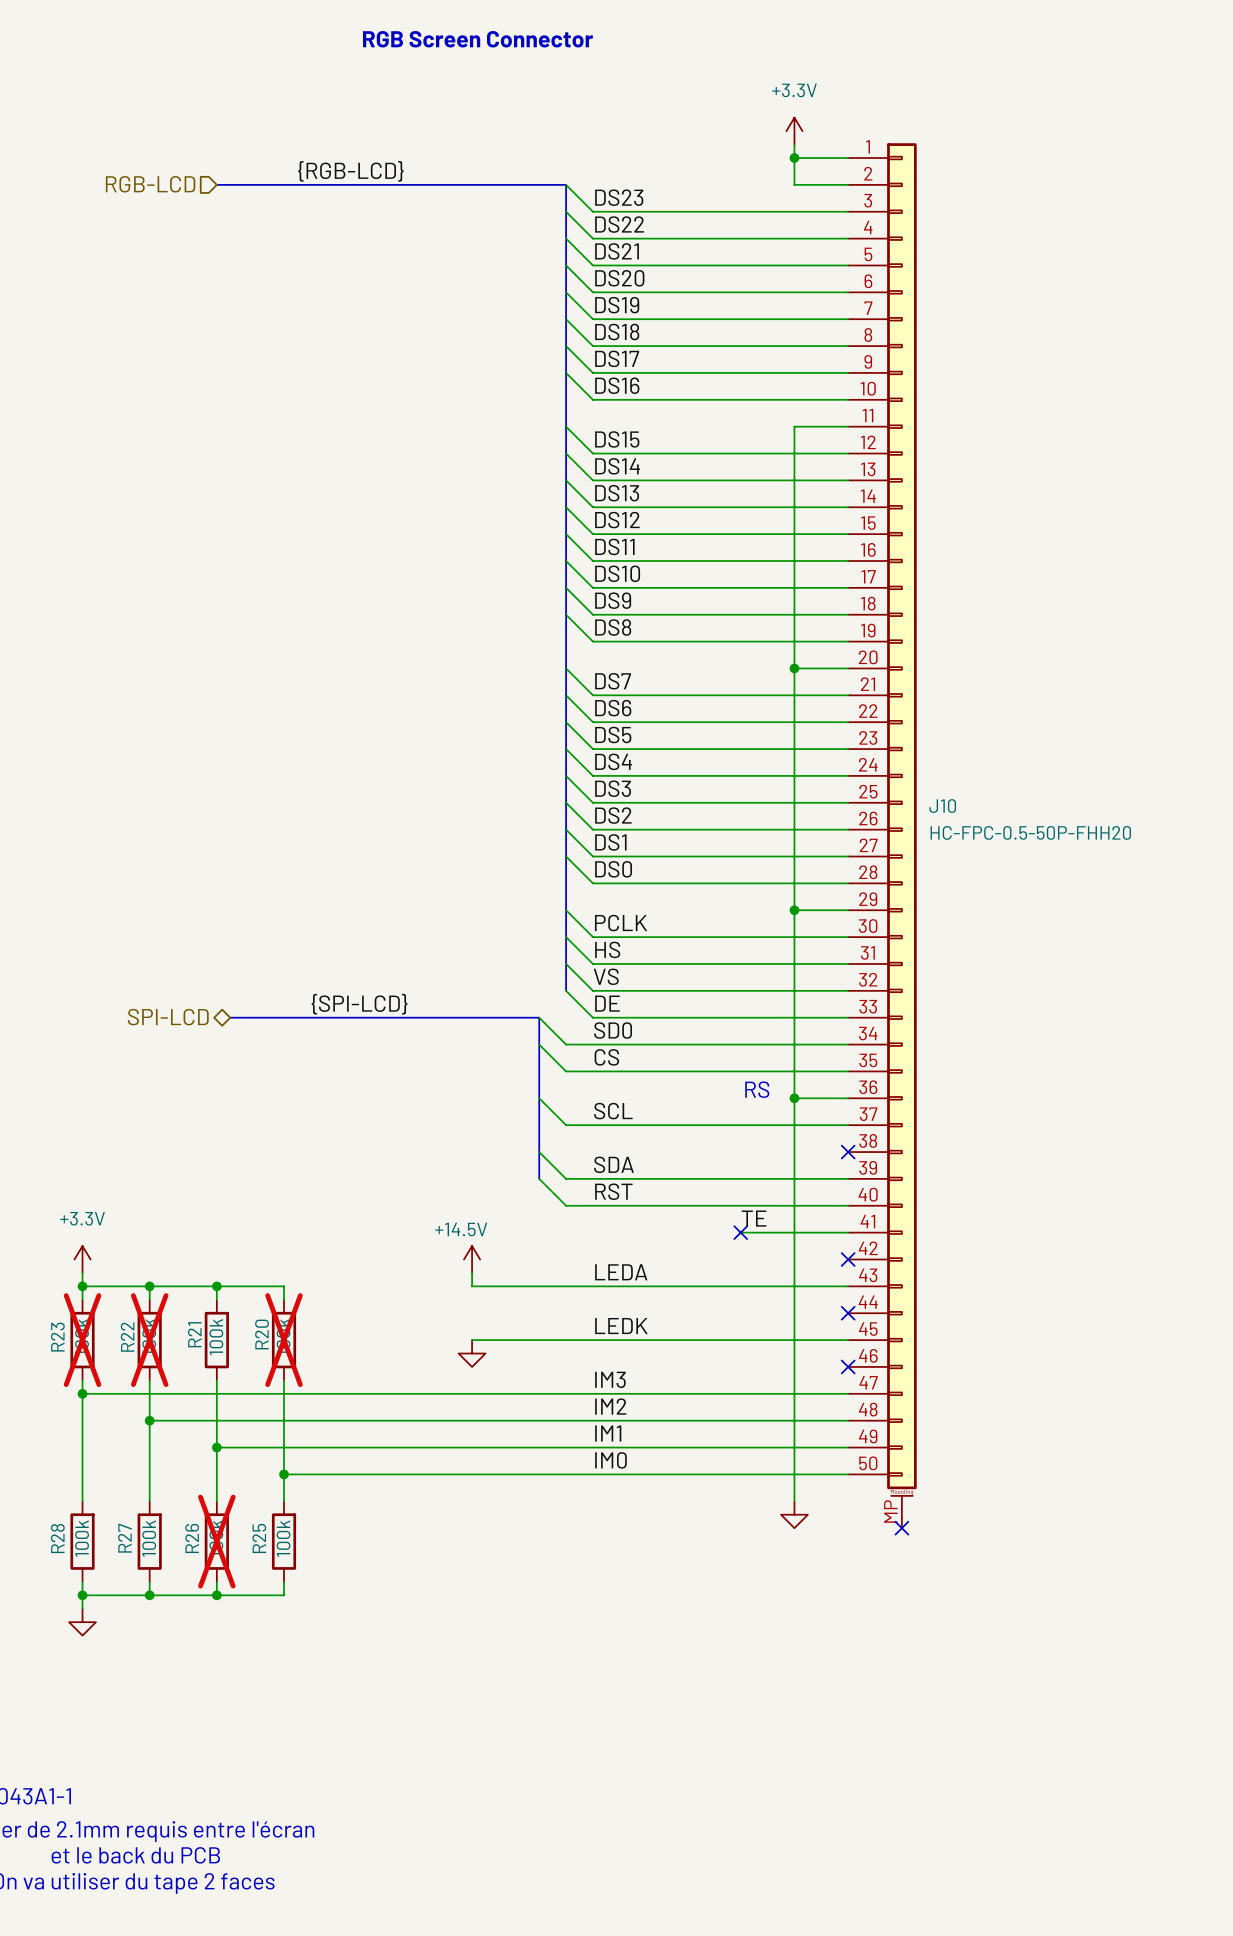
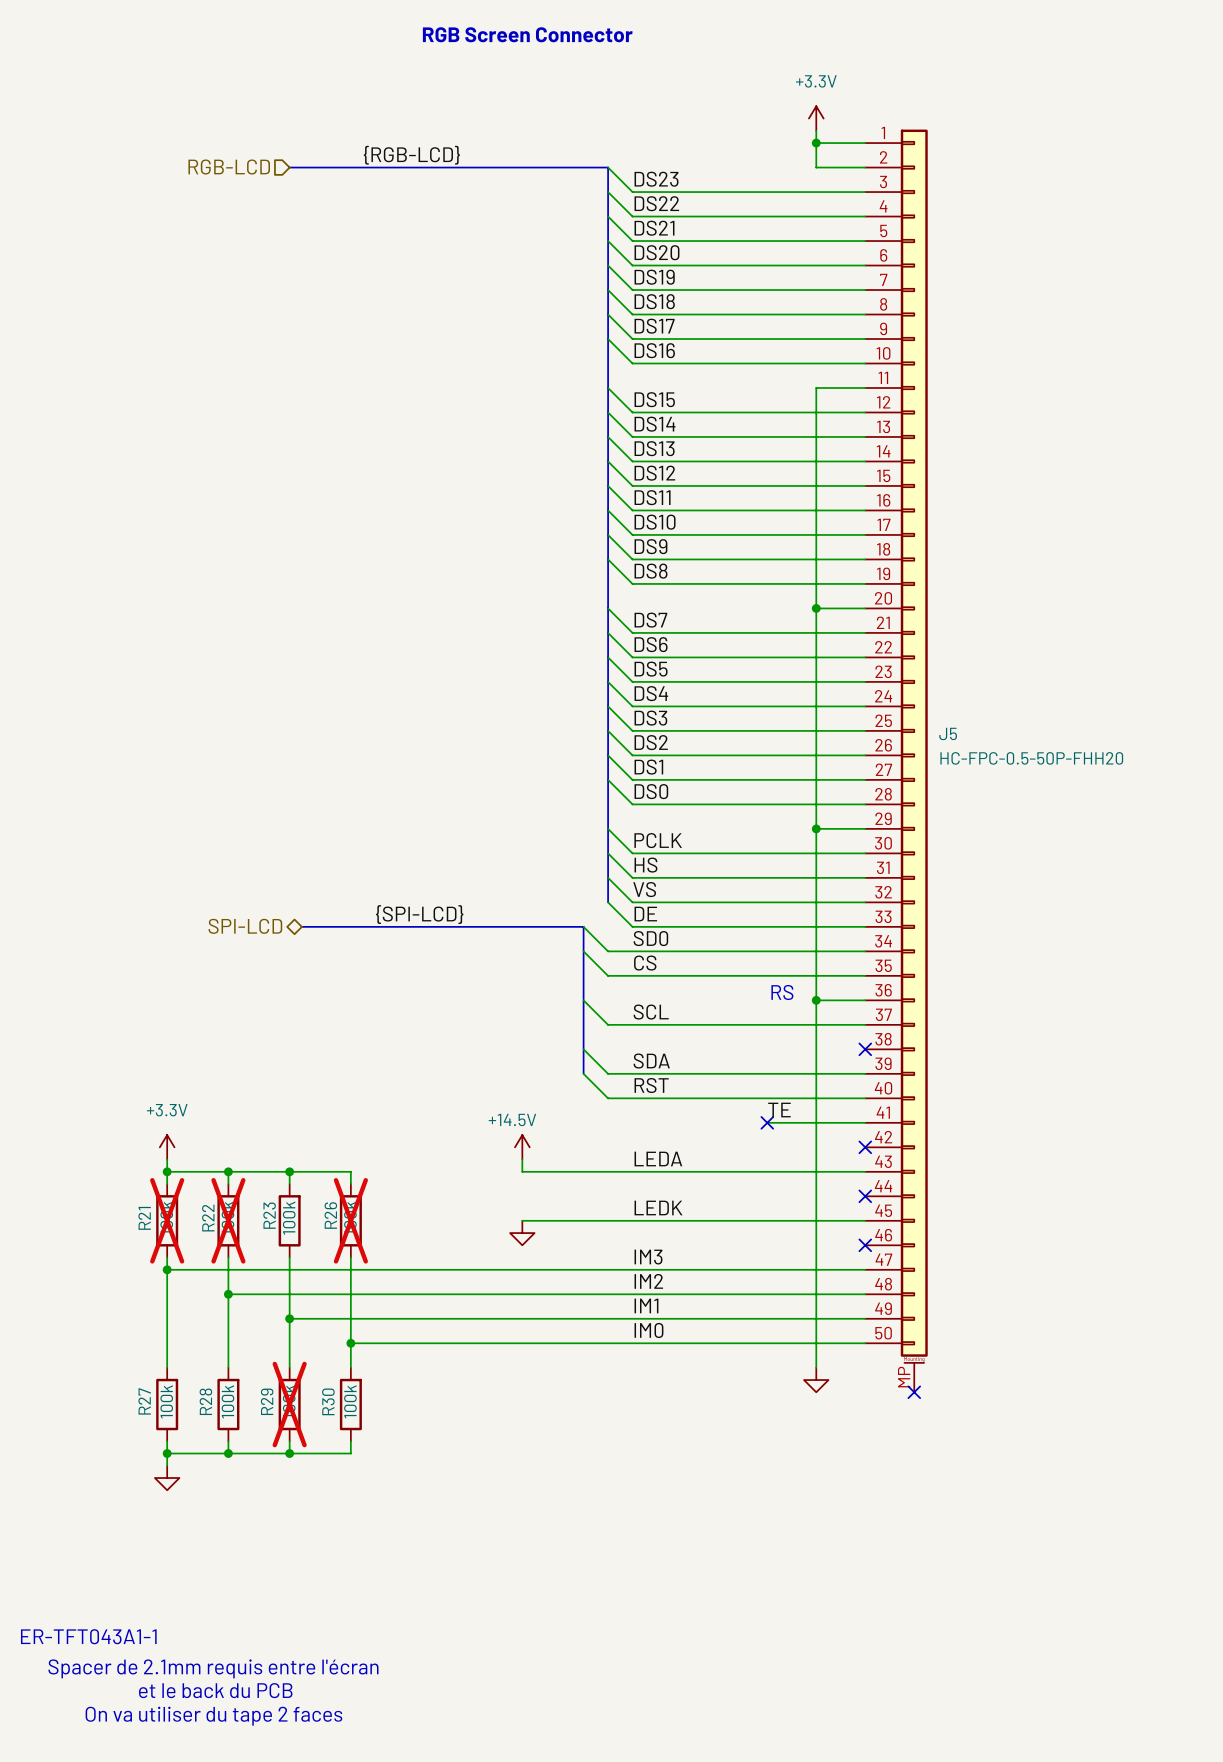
J10 name: J10 (942, 806) -> J5 (948, 733)
R21 name: R21 (194, 1334) -> R23 (269, 1215)
R20 name: R20 (262, 1334) -> R26 (330, 1215)
R23 name: R23 (57, 1337) -> R21 (144, 1218)
R28 name: R28 (57, 1538) -> R27 (144, 1401)
R27 name: R27 (124, 1538) -> R28 (205, 1401)
R26 name: R26 (192, 1538) -> R29 (267, 1401)
R25 name: R25 (259, 1538) -> R30 (328, 1401)

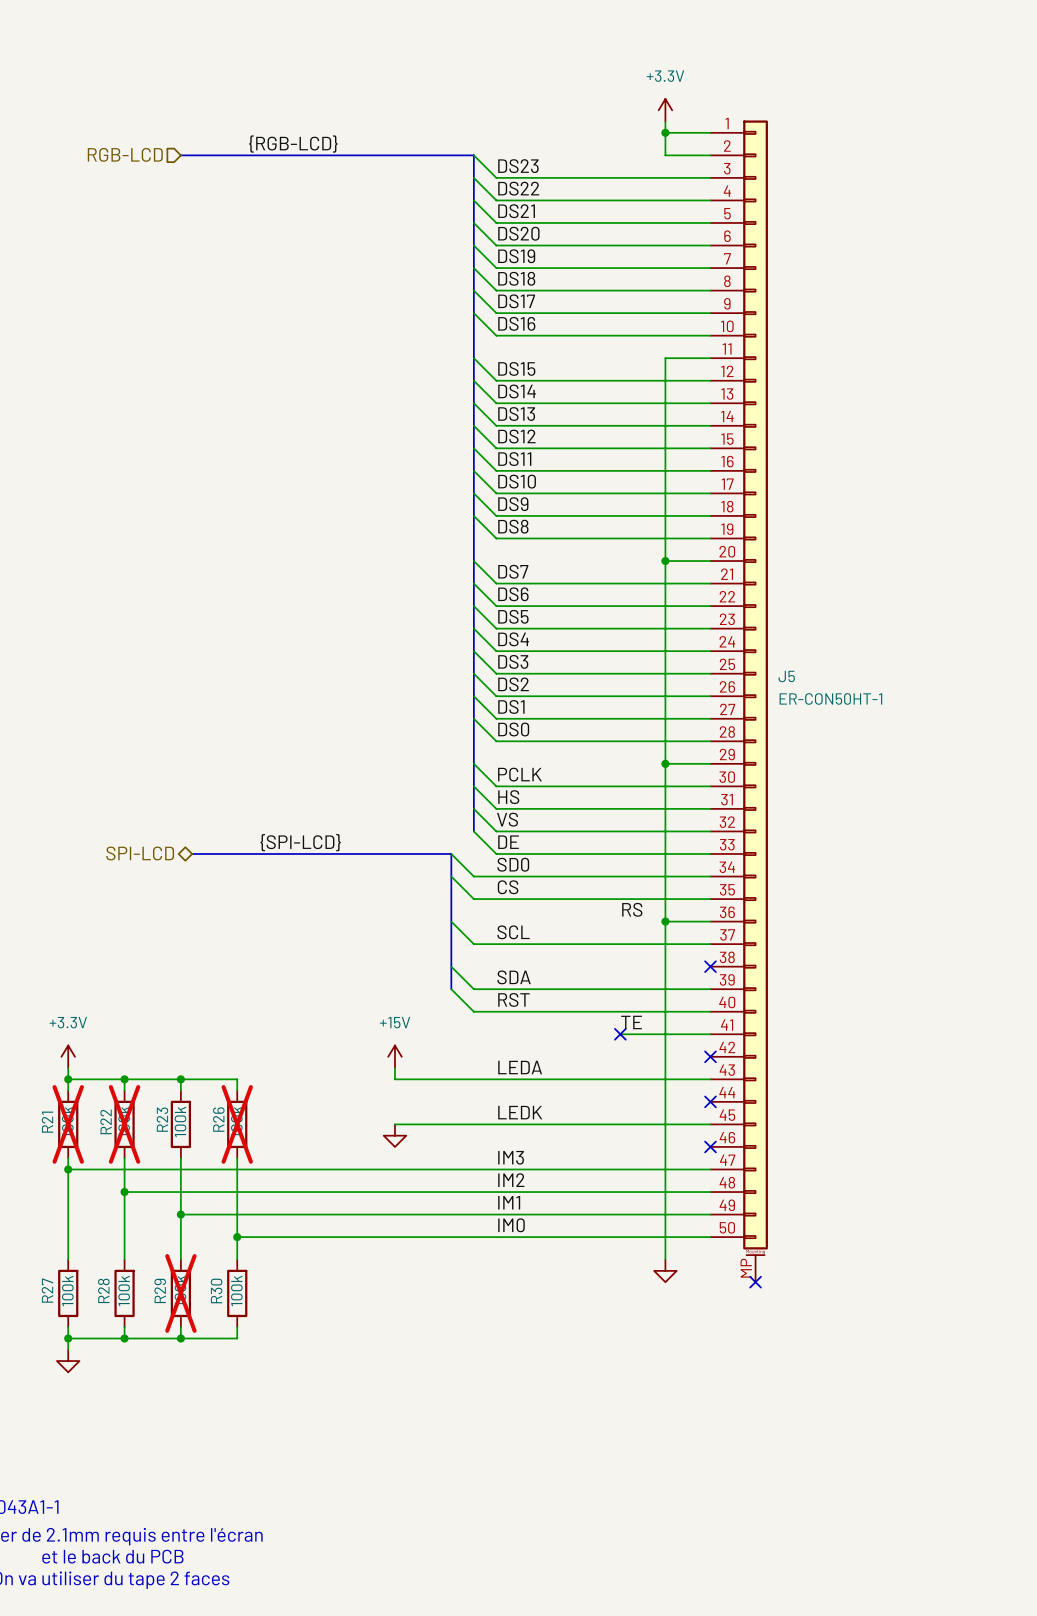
text: RGB Screen Connector (527, 34) -> none
J5 value: HC-FPC-0.5-50P-FHH20 (1031, 758) -> ER-CON50HT-1 (830, 698)
label: none -> RS (632, 909)
text: RS (782, 992) -> none
power symbol: +14.5V (522, 1147) -> +15V (394, 1056)

